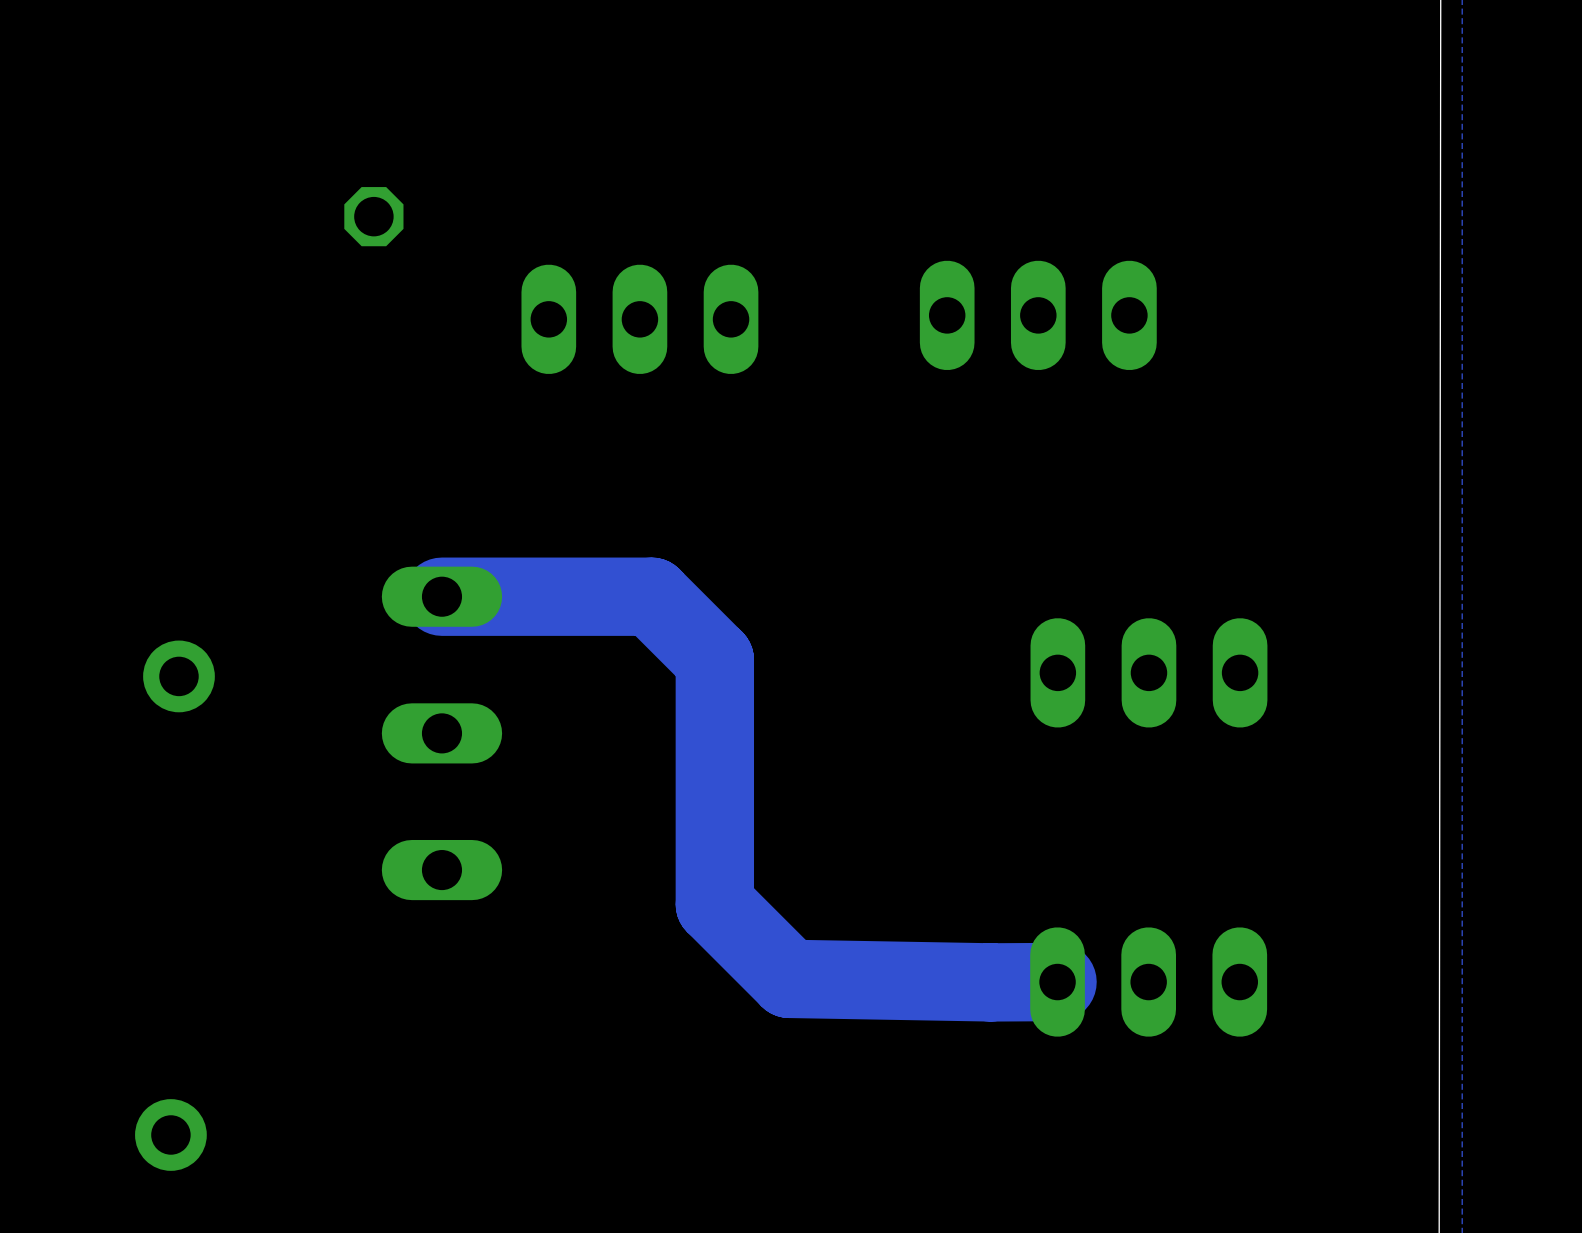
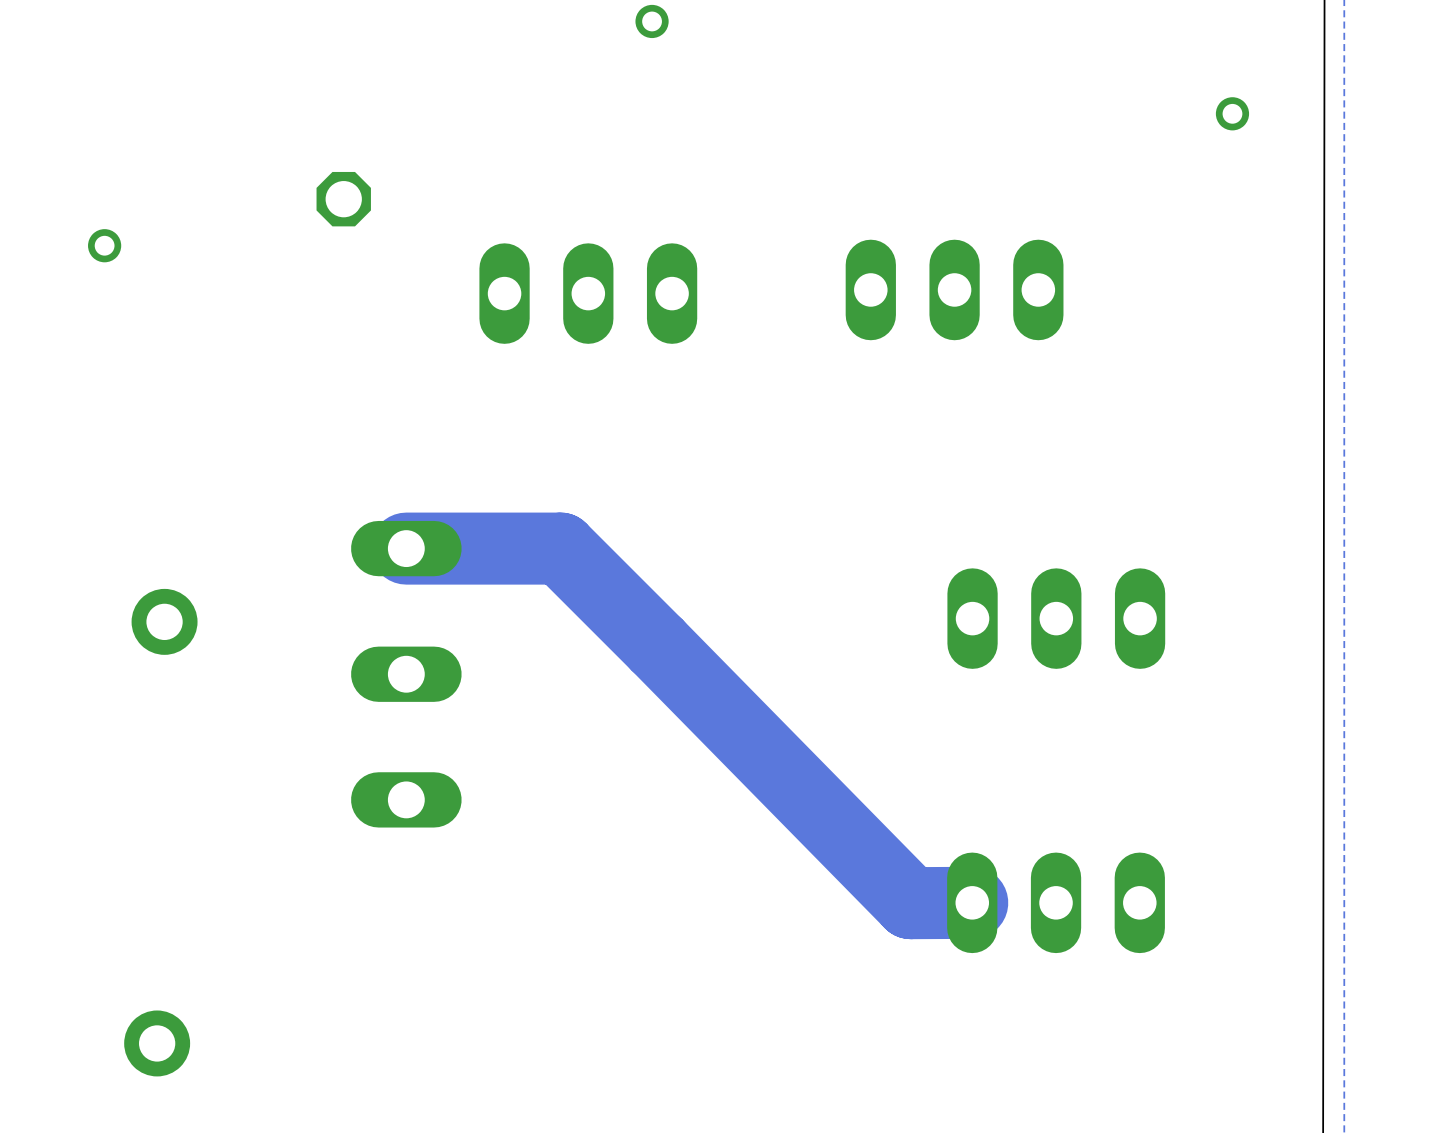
via: none -> (652, 21)
via: none -> (1232, 113)
via: none -> (104, 245)
track: (609, 596) (651, 596) (714, 659) (714, 904) (789, 978) (990, 982) -> (560, 548) (910, 903)

